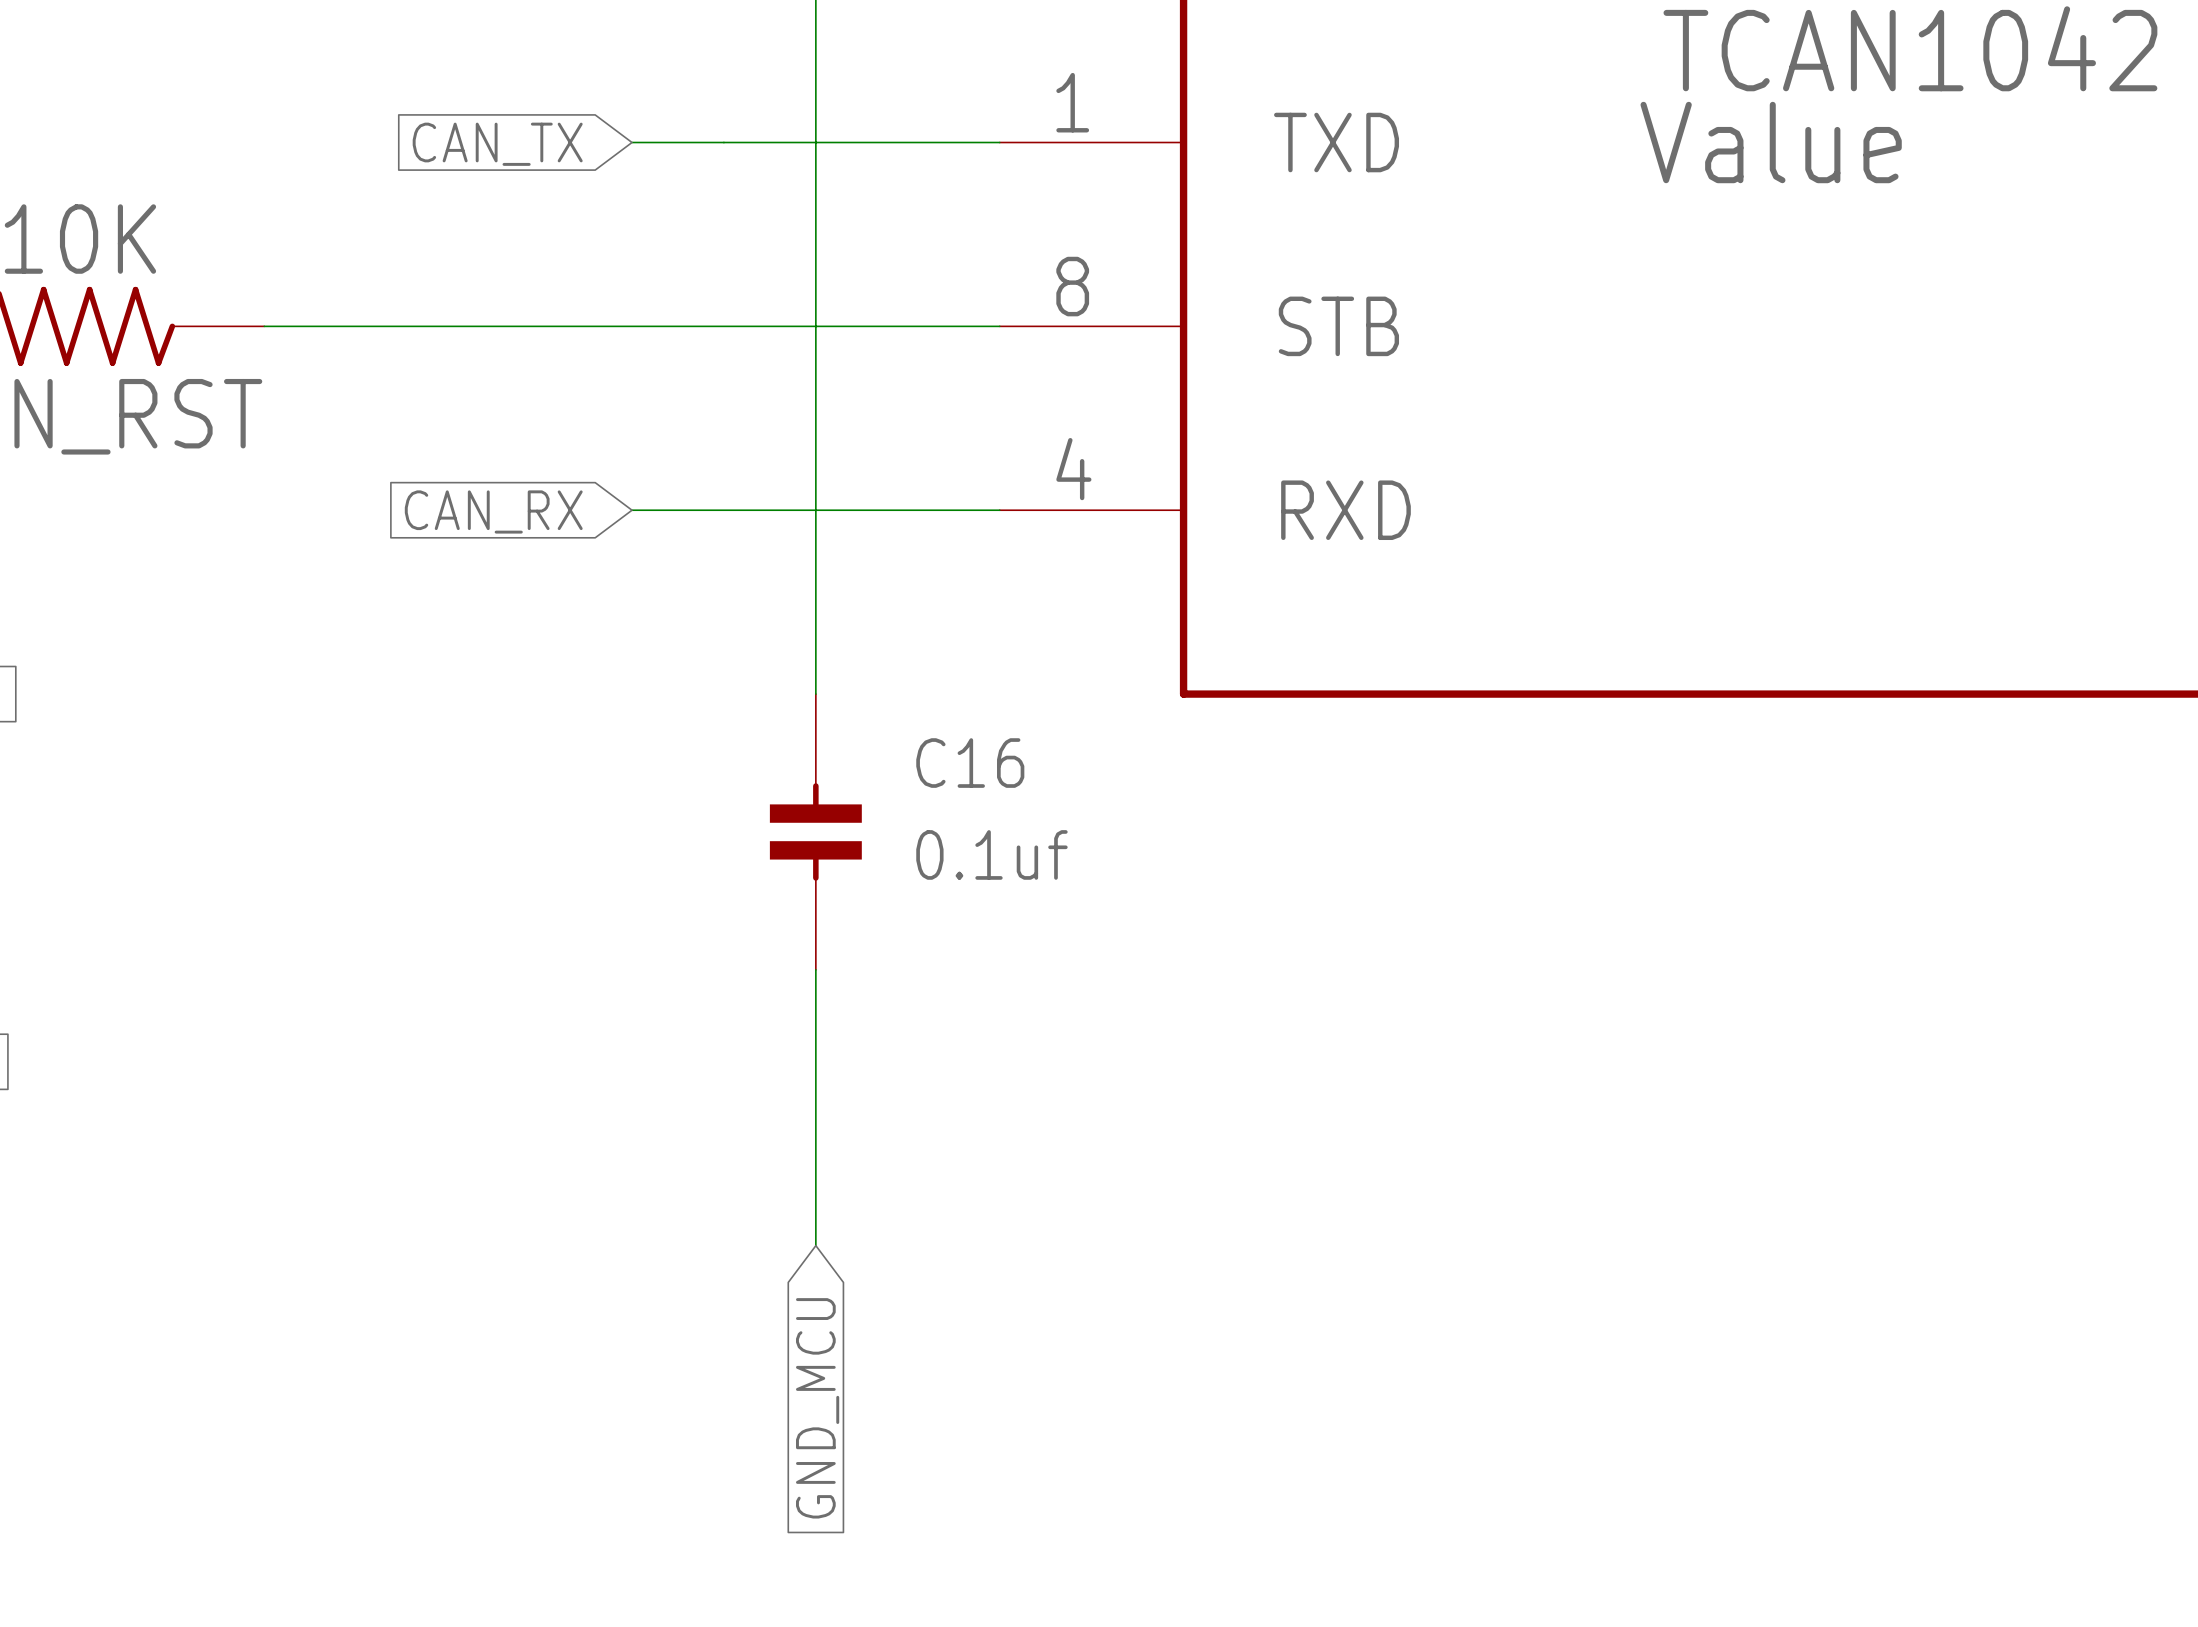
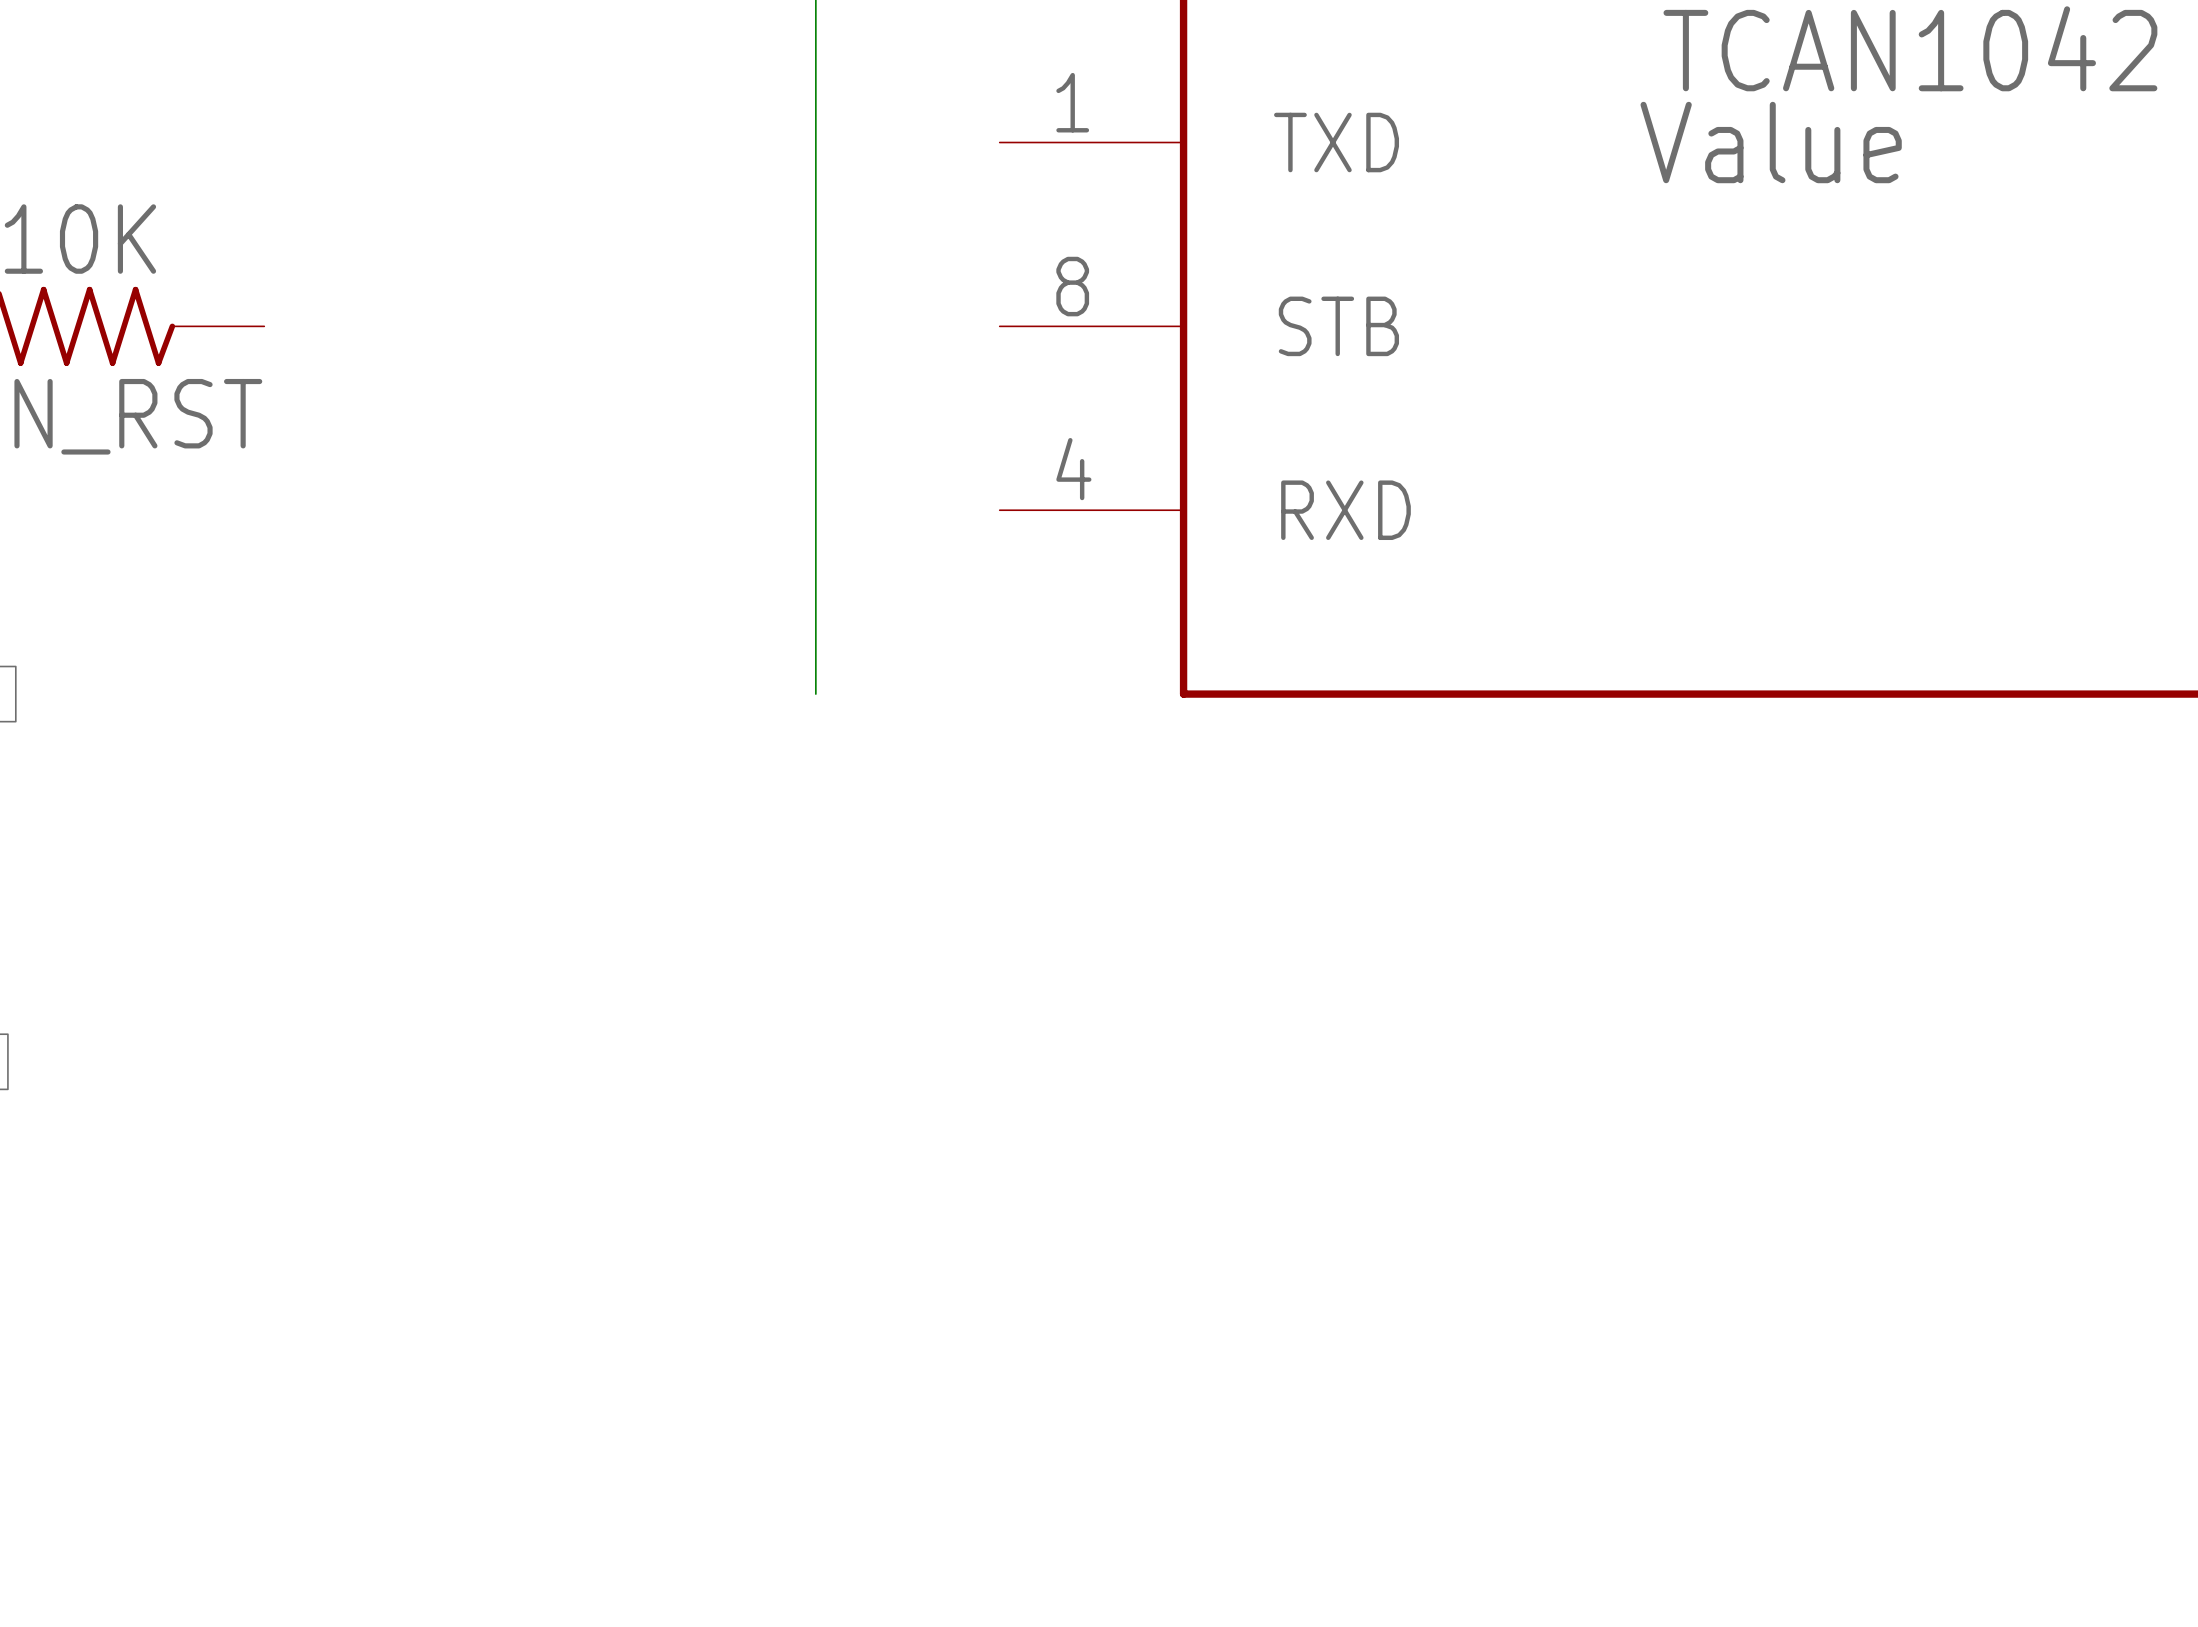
wire: (632, 142) (999, 142) -> none
global label: CAN_TX (497, 144) -> none
wire: (264, 326) (999, 326) -> none
wire: (632, 510) (999, 510) -> none
global label: CAN_RX (493, 511) -> none
C16: 0.1uf (815, 831) -> none
wire: (815, 969) (815, 1245) -> none
global label: GND_MCU (817, 1408) -> none

